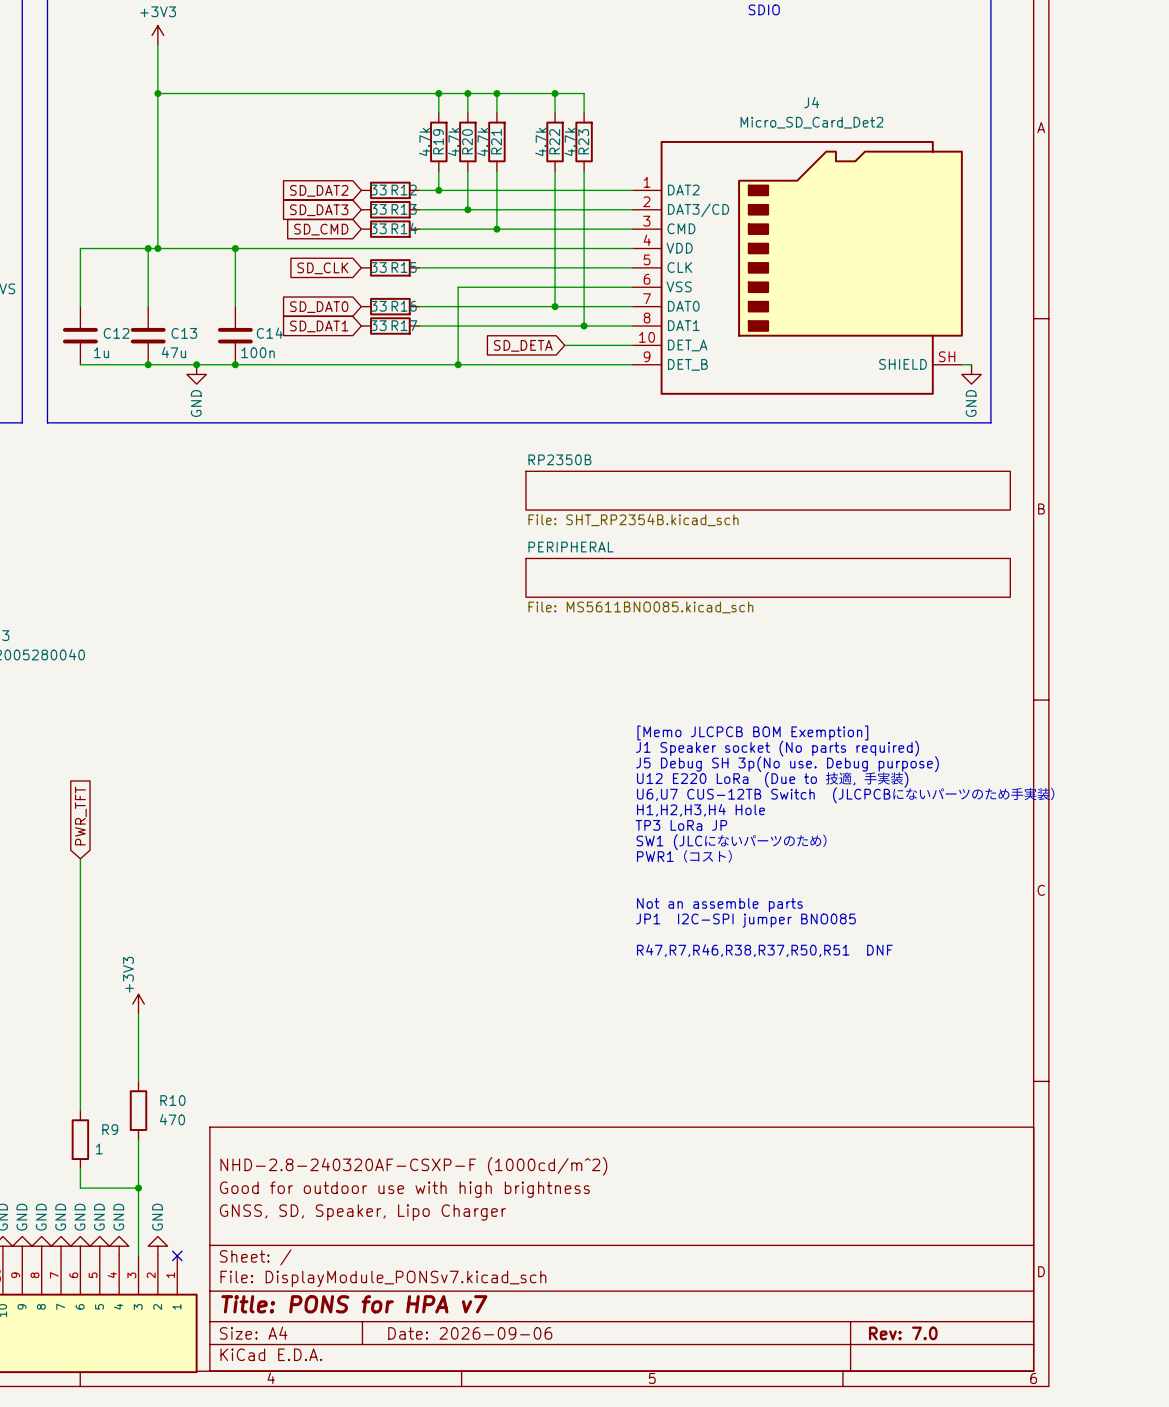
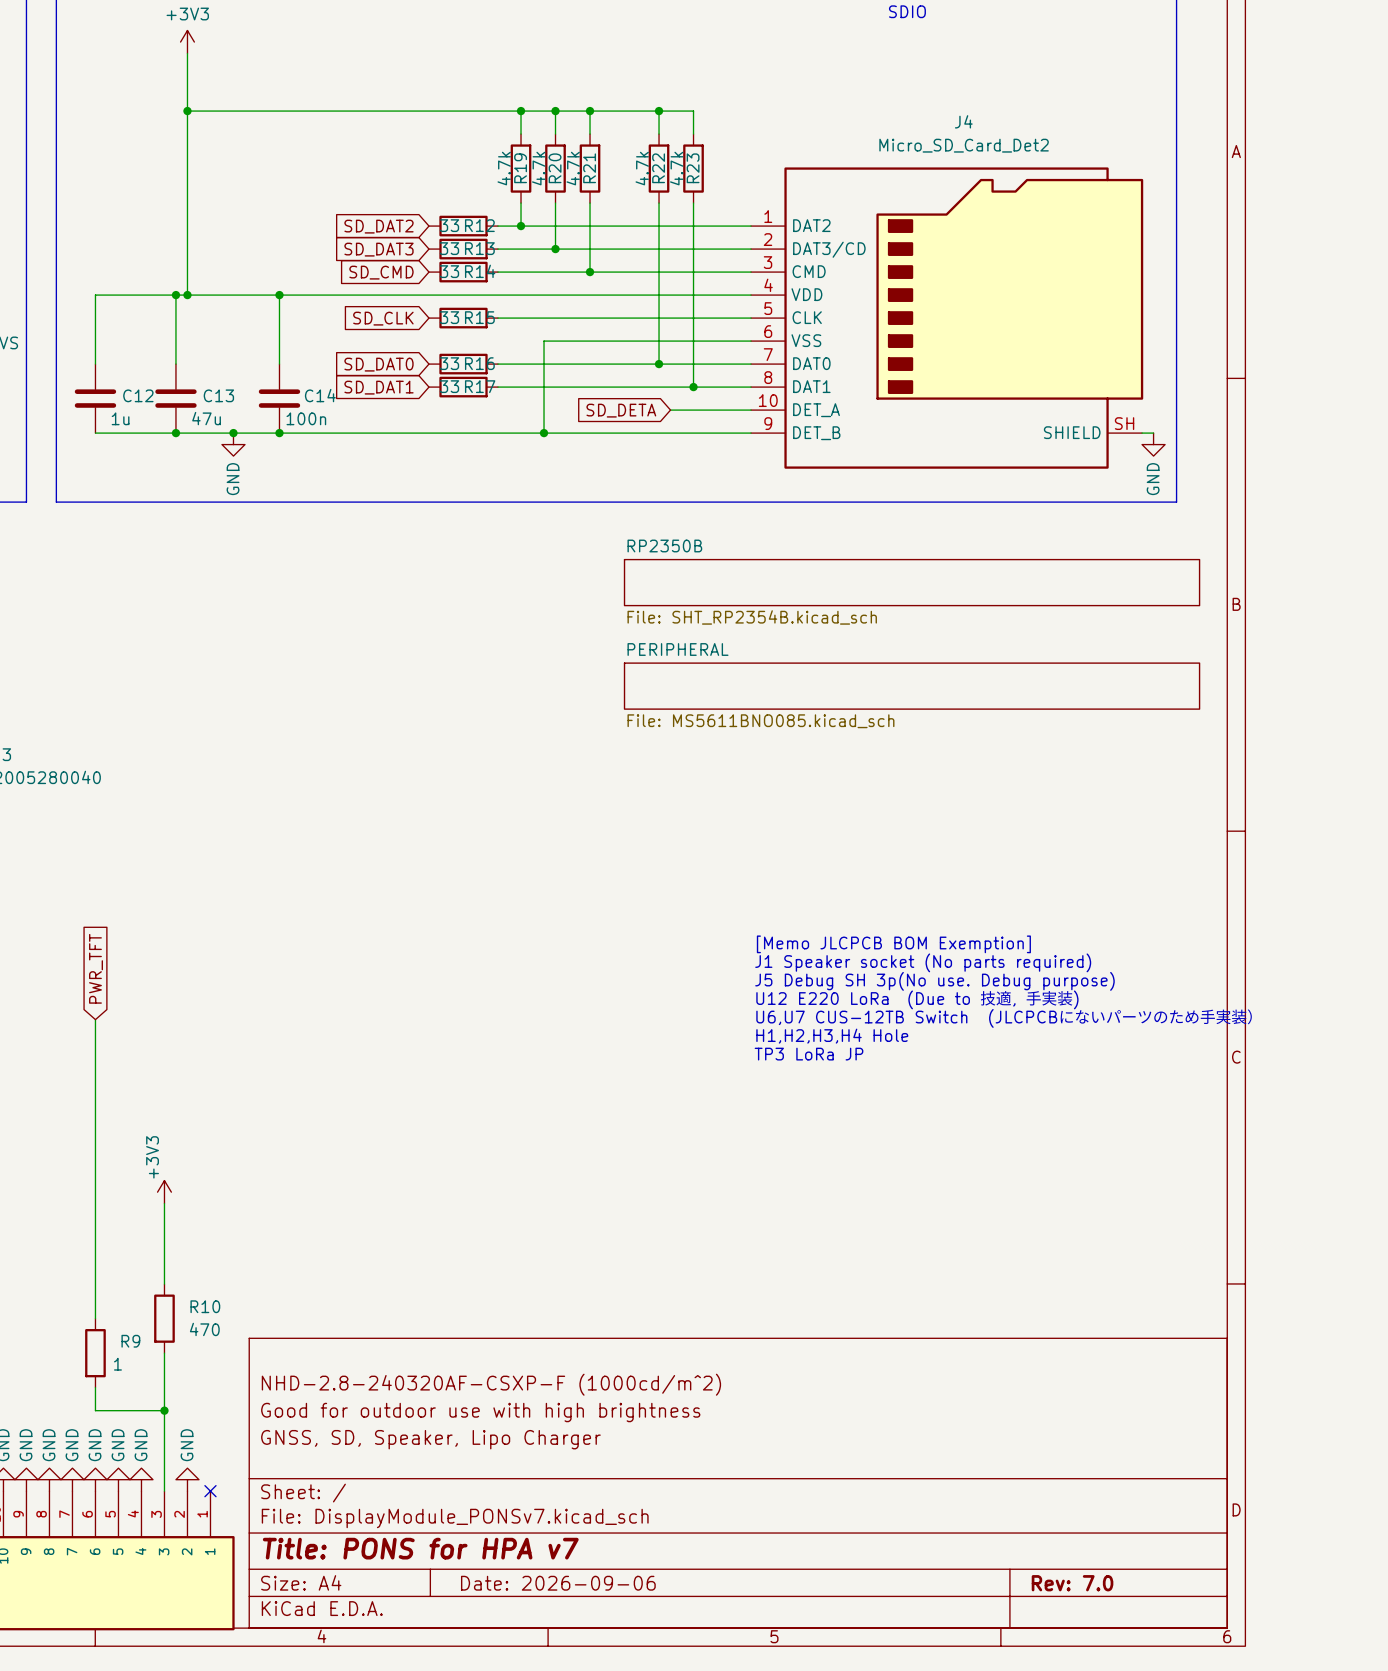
text: [Memo JLCPCB BOM Exemption] (752, 732) -> none
text: J1 Speaker socket (No parts required) (777, 748) -> none
text: J5 Debug SH 3p(No use. Debug purpose) (787, 764) -> none
text: U12 E220 LoRa (Due to 技適, 手実装) (772, 779) -> none
text: U6,U7 CUS-12TB Switch (JLCPCBにないパーツのため手実装） (845, 795) -> [Memo JLCPCB BOM Exemption] (893, 944)
text: H1,H2,H3,H4 Hole (700, 810) -> J1 Speaker socket (No parts required) (923, 962)
text: TP3 LoRa JP (681, 825) -> J5 Debug SH 3p(No use. Debug purpose) (934, 981)
text: SW1 (JLCにないパーツのため） (731, 842) -> U12 E220 LoRa (Due to 技適, 手実装) (917, 999)
text: PWR1（コスト） (684, 856) -> U6,U7 CUS-12TB Switch (JLCPCBにないパーツのため手実装） (1004, 1018)
text: none -> H1,H2,H3,H4 Hole (832, 1036)
text: none -> TP3 LoRa JP (809, 1054)
text: Not an assemble parts (719, 904) -> none
text: JP1 I2C-SPI jumper BNO085 (745, 920) -> none
text: R47,R7,R46,R38,R37,R50,R51 DNF (764, 950) -> none

